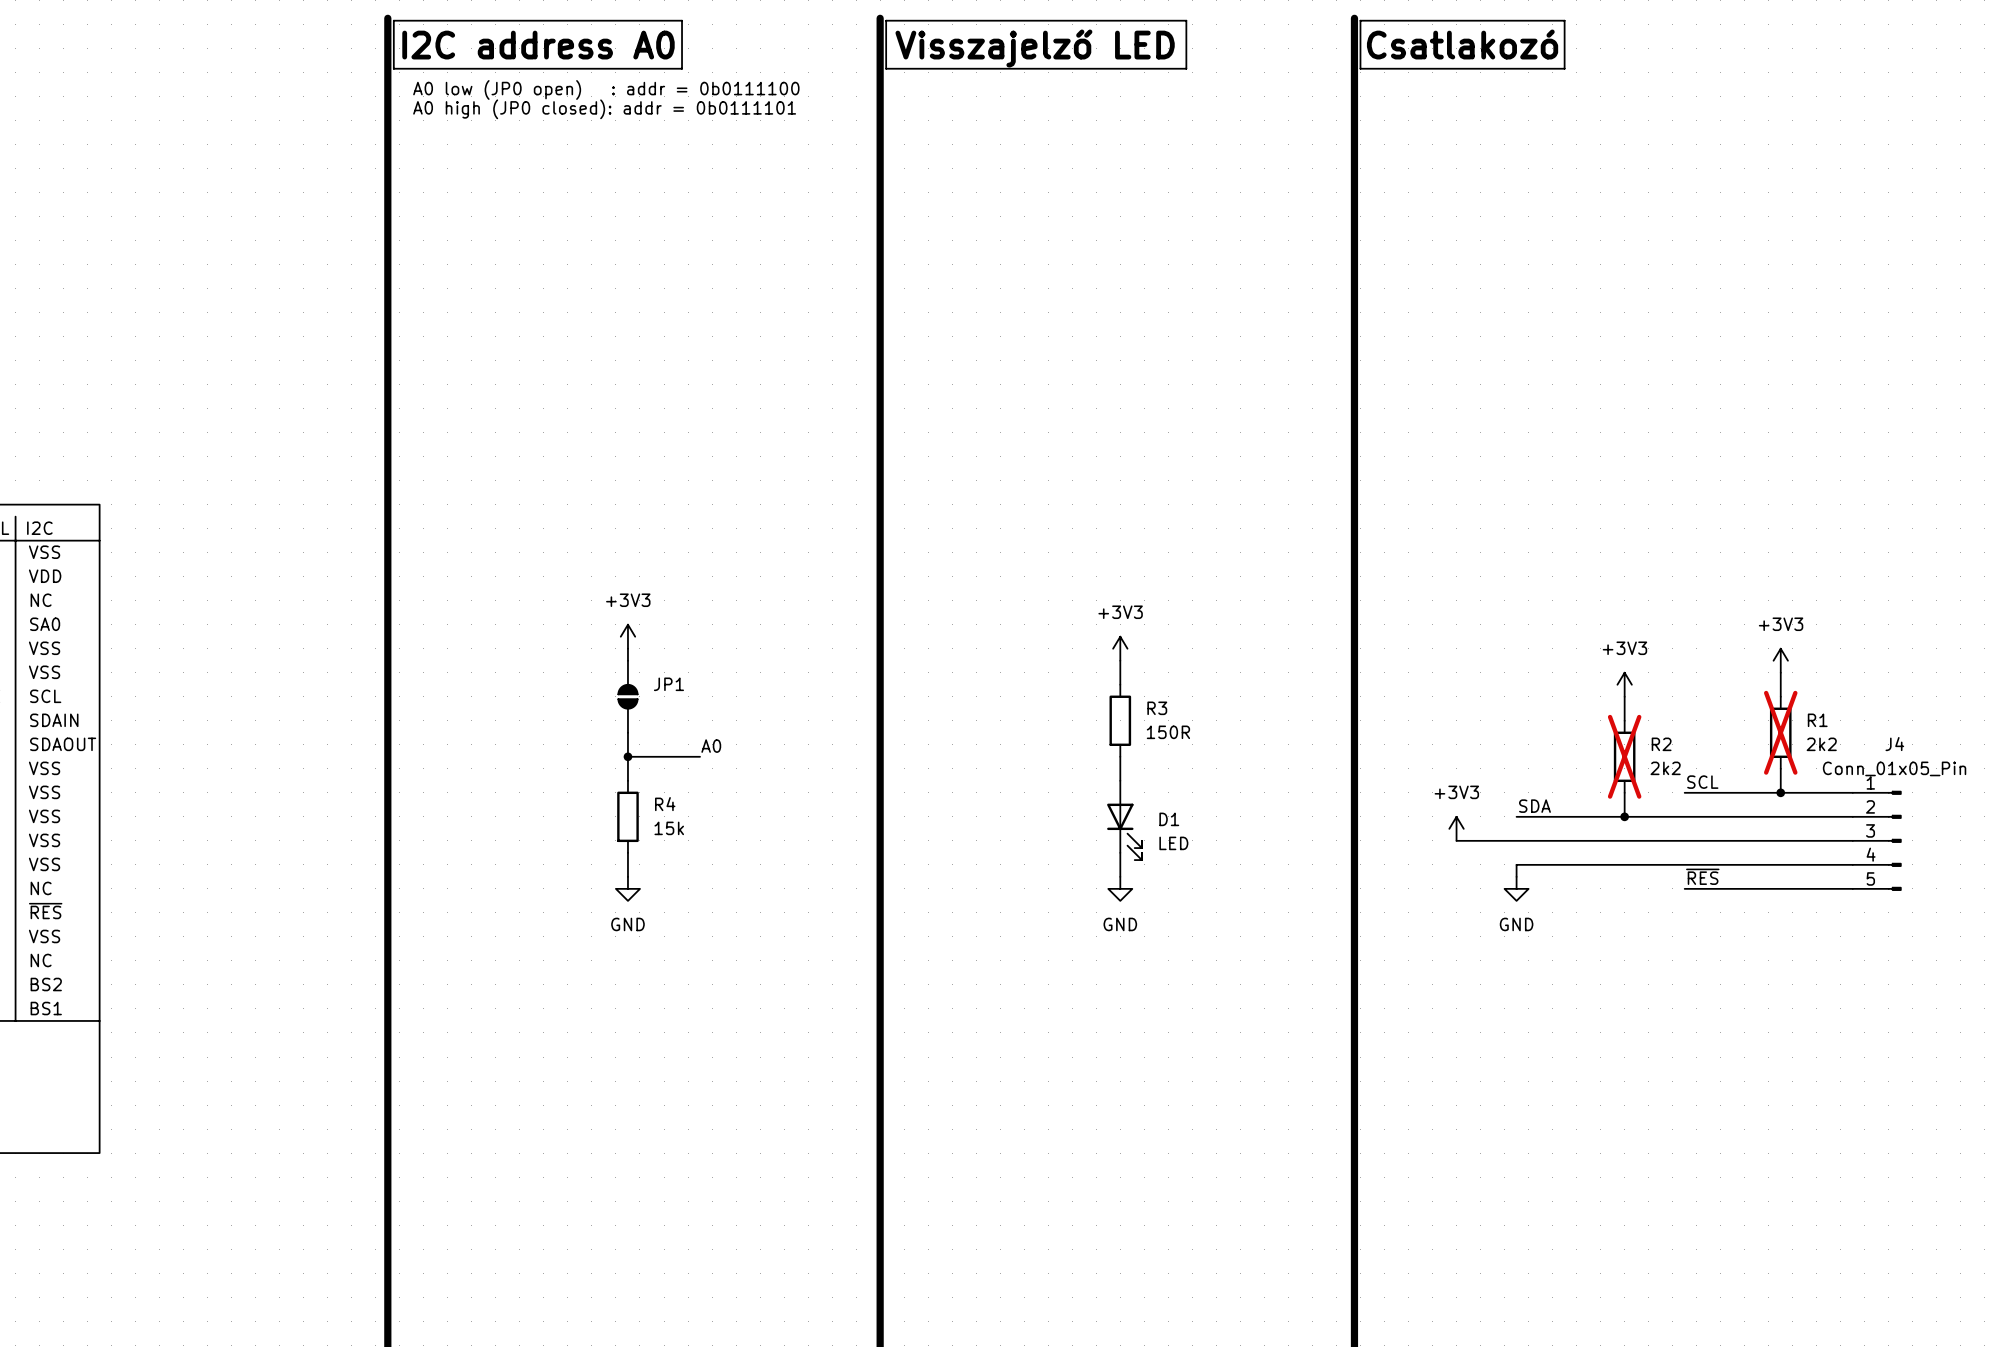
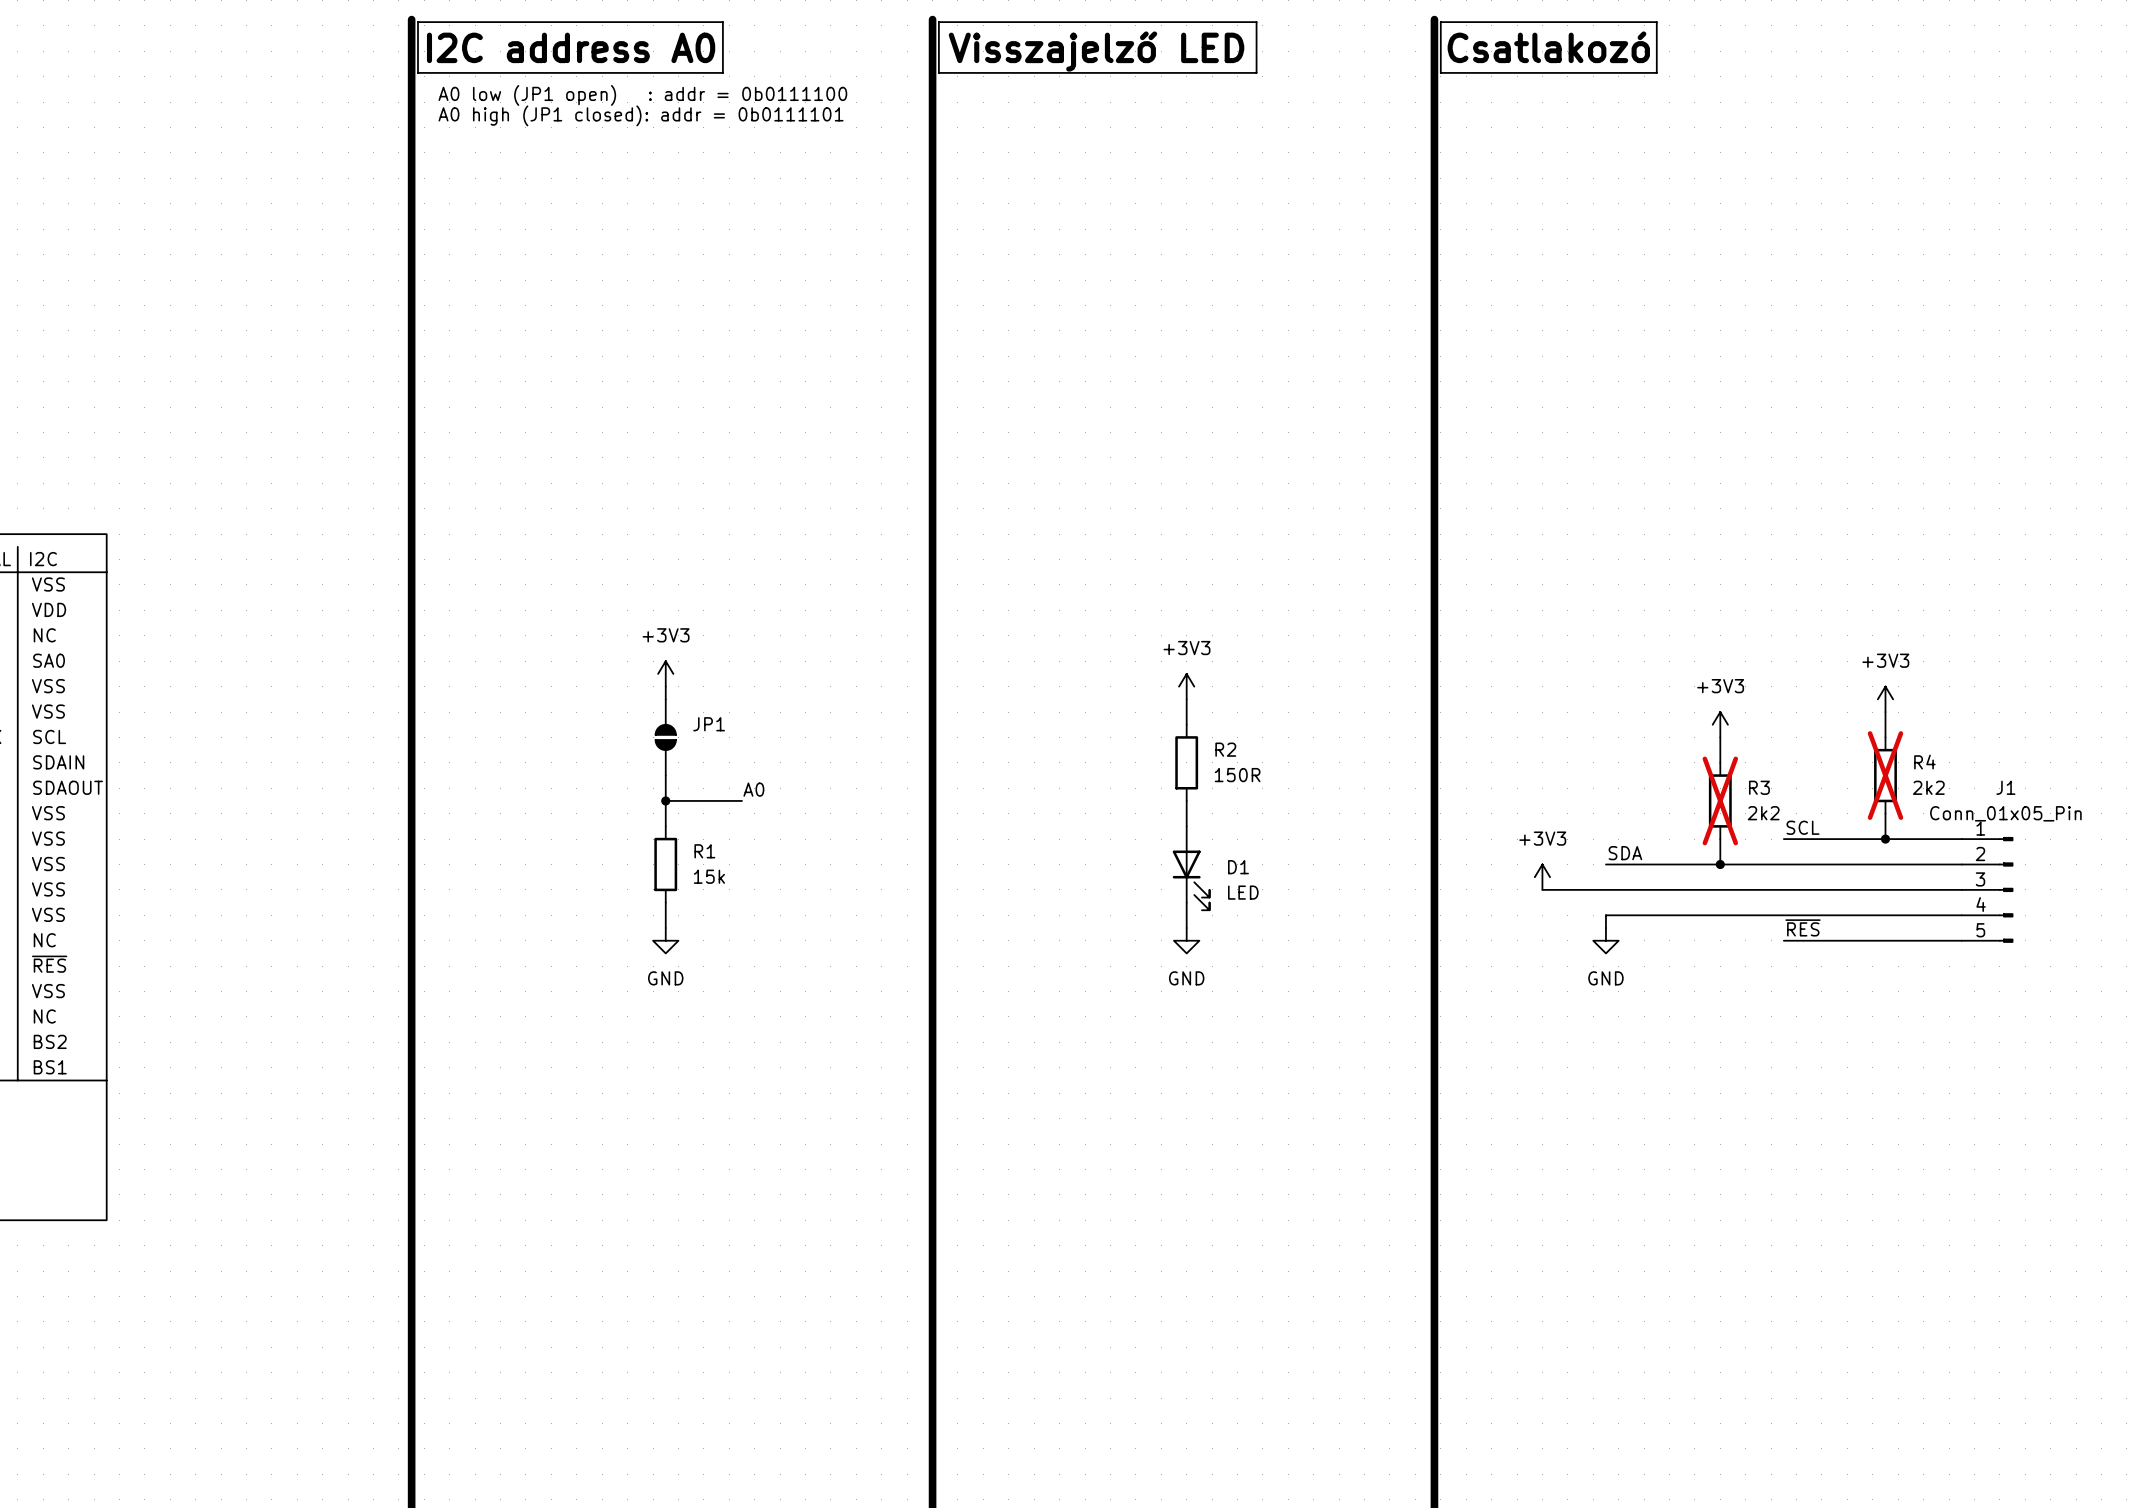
text: A0 low (JP0 open) : addr = 0b0111100 (606, 89) -> A0 low (JP1 open) : addr = 0b0111100 (642, 95)
text: A0 high (JP0 closed): addr = 0b0111101 (604, 109) -> A0 high (JP1 closed): addr = 0b0111101 (641, 115)
R3 name: R3 (1157, 708) -> R2 (1225, 749)
R1 name: R1 (1817, 720) -> R4 (1924, 762)
R2 name: R2 (1661, 744) -> R3 (1759, 787)
J4 name: J4 (1894, 744) -> J1 (2005, 787)
R4 name: R4 (665, 804) -> R1 (704, 851)

